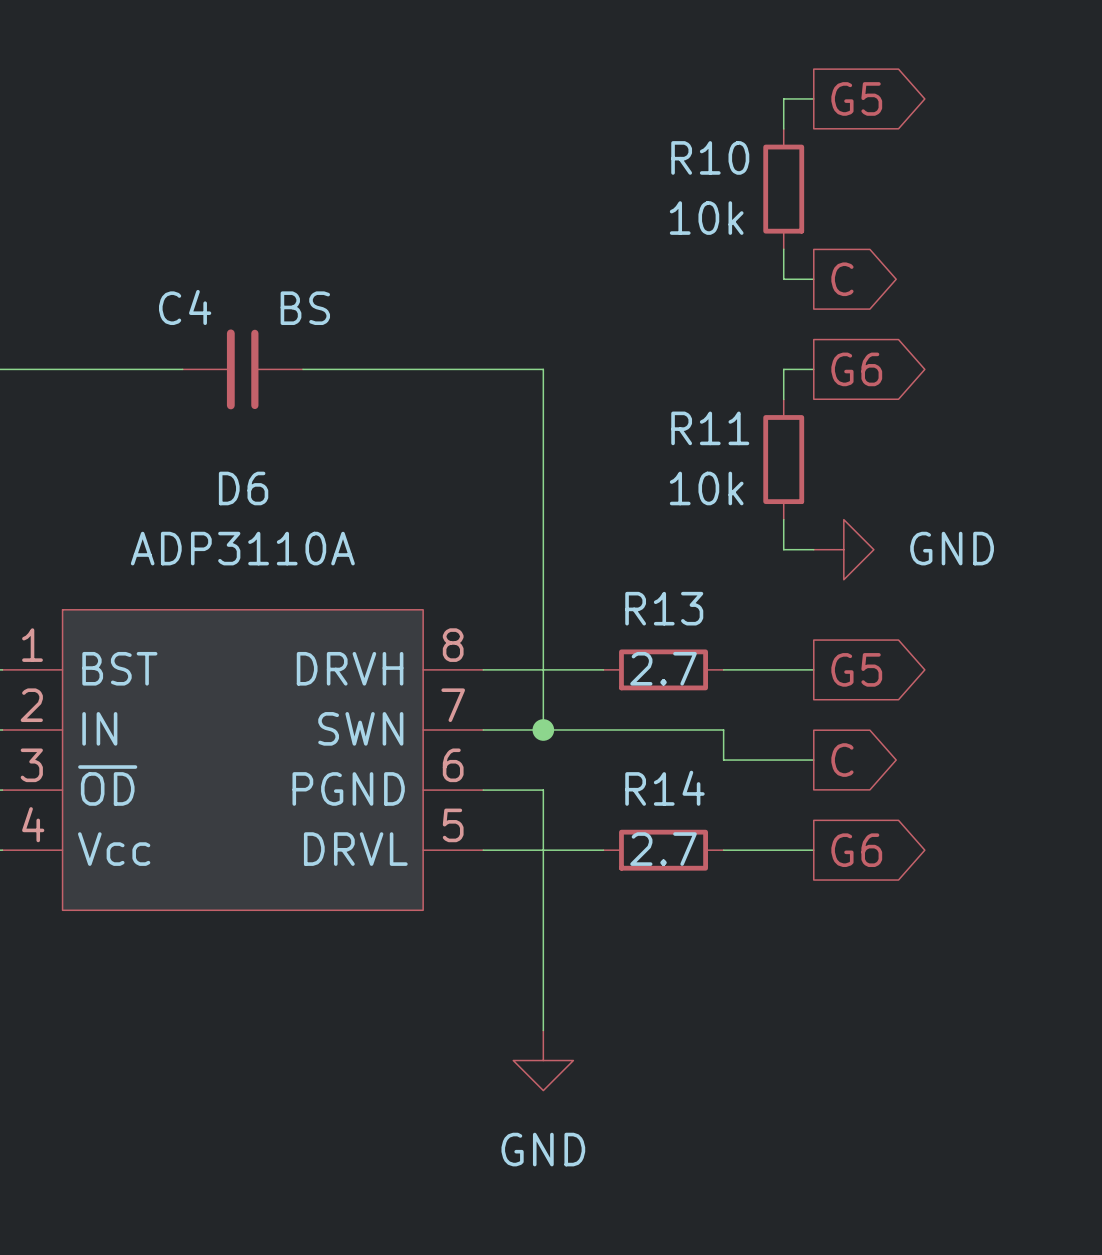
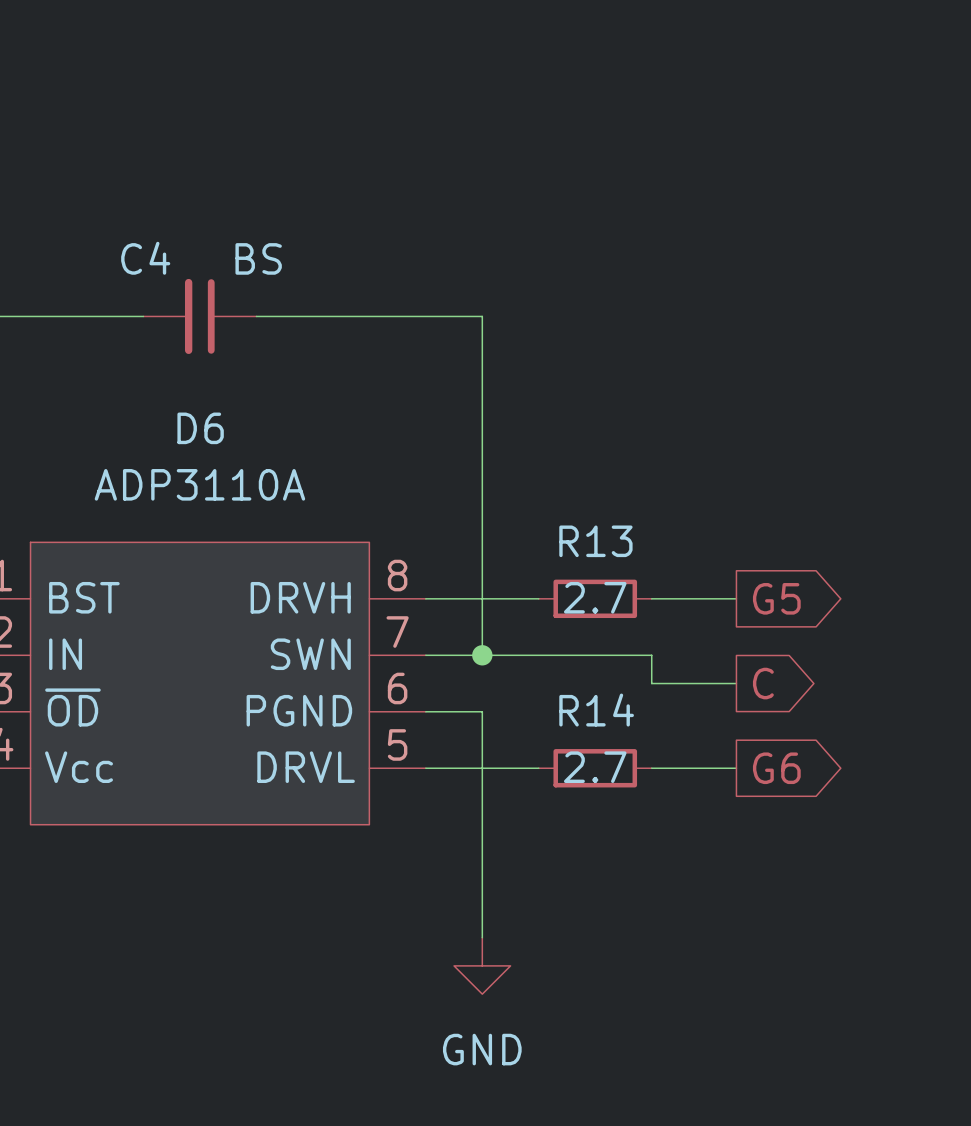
wire: (813, 98) (783, 98) (783, 129) -> none
global label: G5 (856, 98) -> none
R10: 10k (783, 189) -> none
wire: (783, 249) (783, 279) (813, 279) -> none
global label: C (842, 279) -> none
wire: (813, 369) (783, 369) (783, 399) -> none
global label: G6 (856, 369) -> none
R11: 10k (783, 459) -> none
wire: (783, 519) (783, 549) (813, 549) -> none
power symbol: GND (843, 549) -> none

